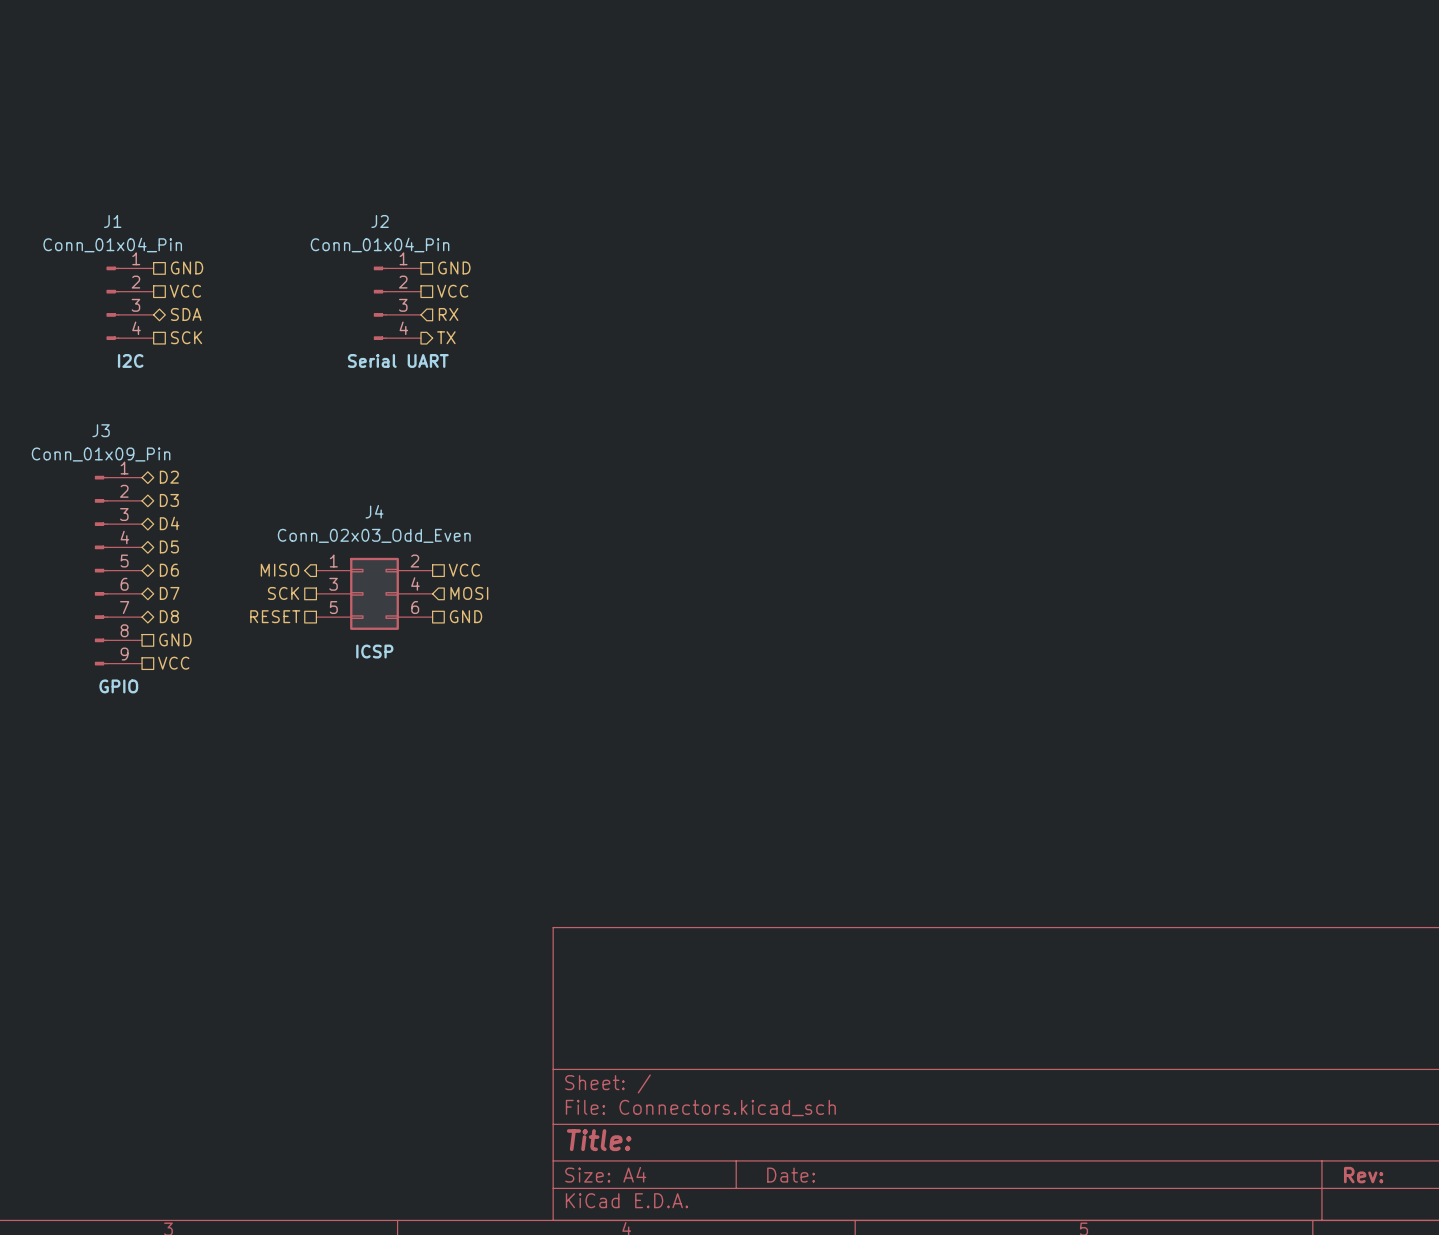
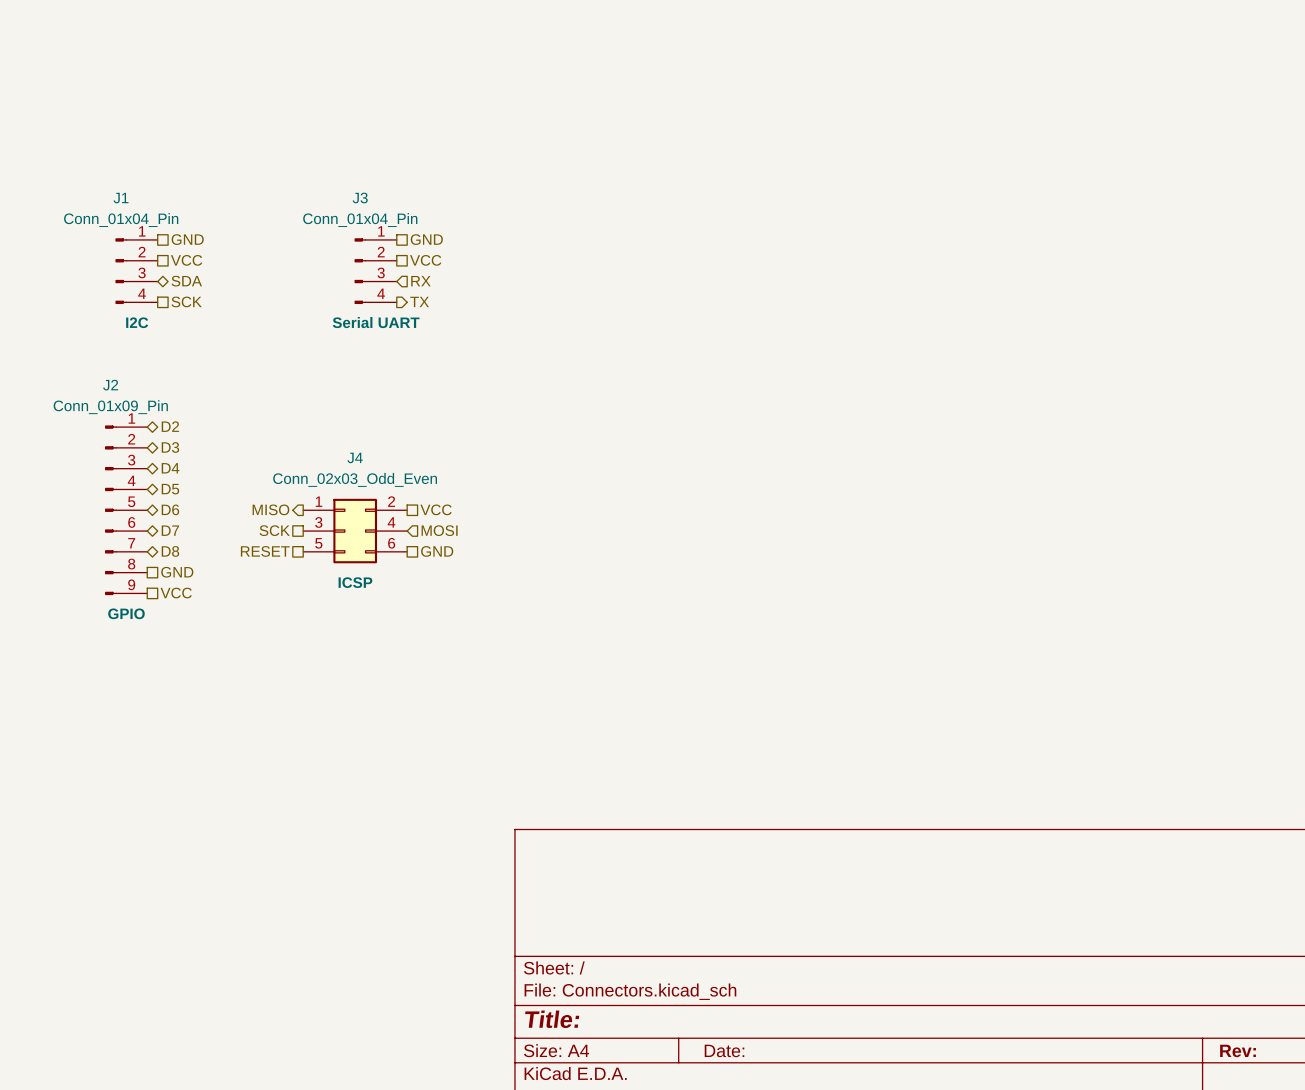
J2 name: J2 (380, 221) -> J3 (360, 197)
J3 name: J3 (101, 430) -> J2 (110, 385)

